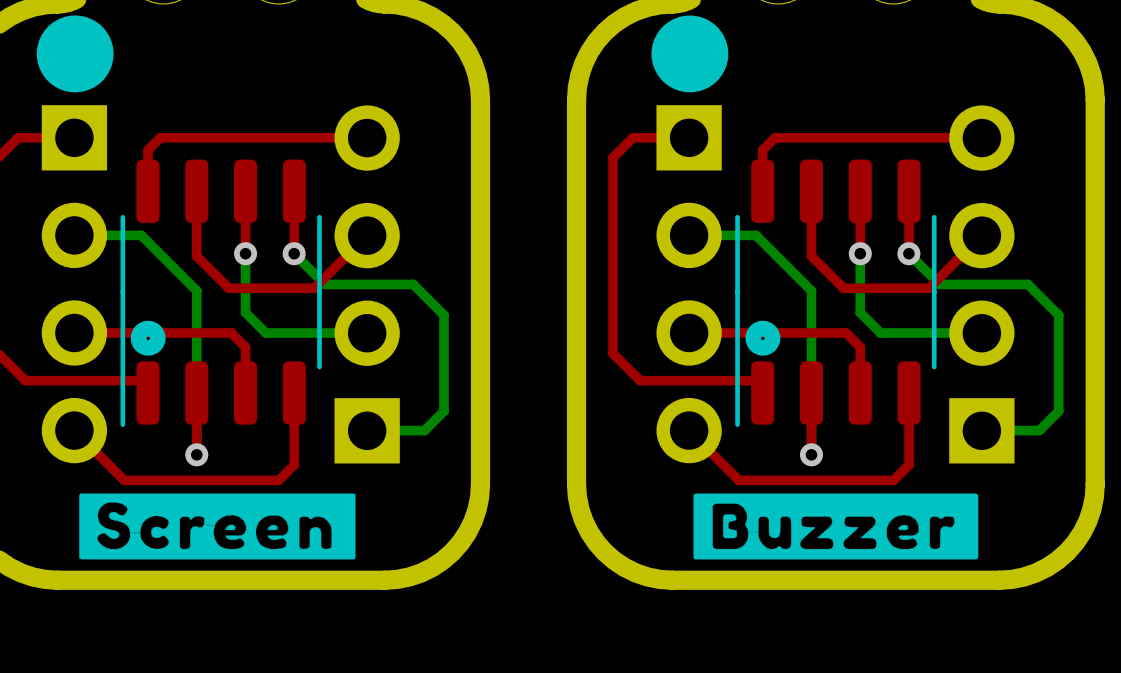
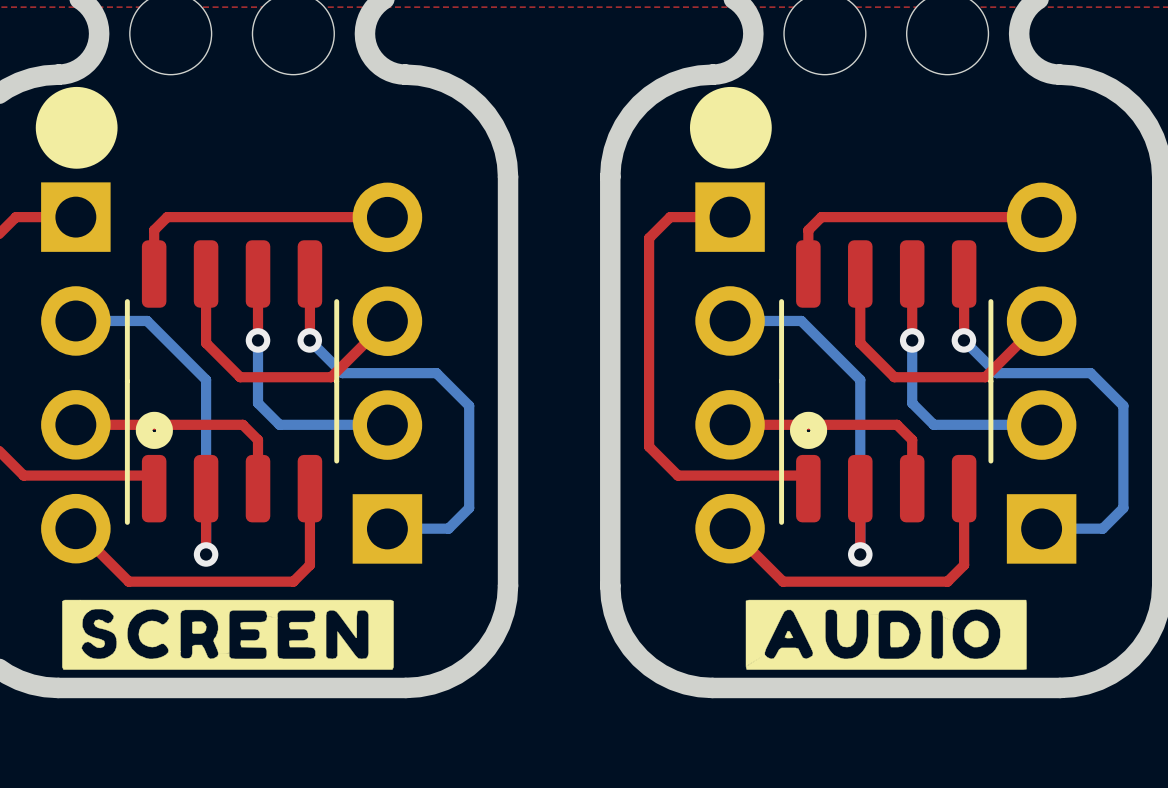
drawing shape: [79, 493, 356, 560] -> [62, 599, 394, 670]
drawing shape: [693, 493, 979, 560] -> [745, 599, 1027, 670]

